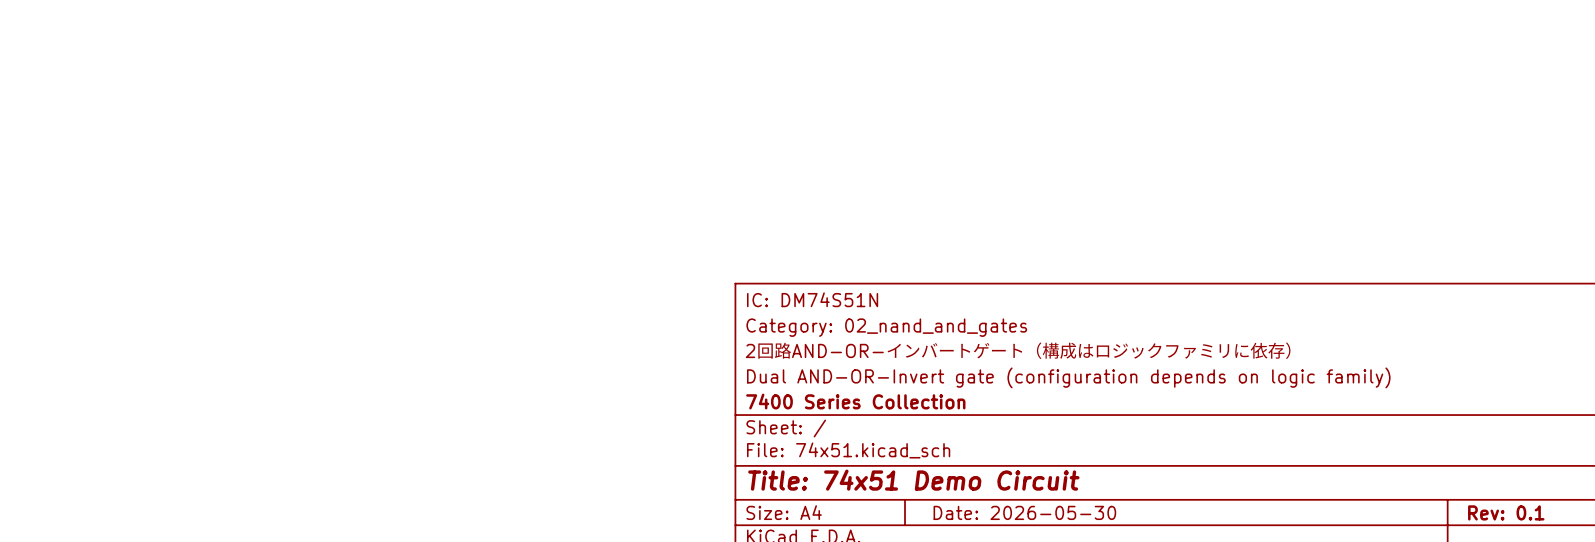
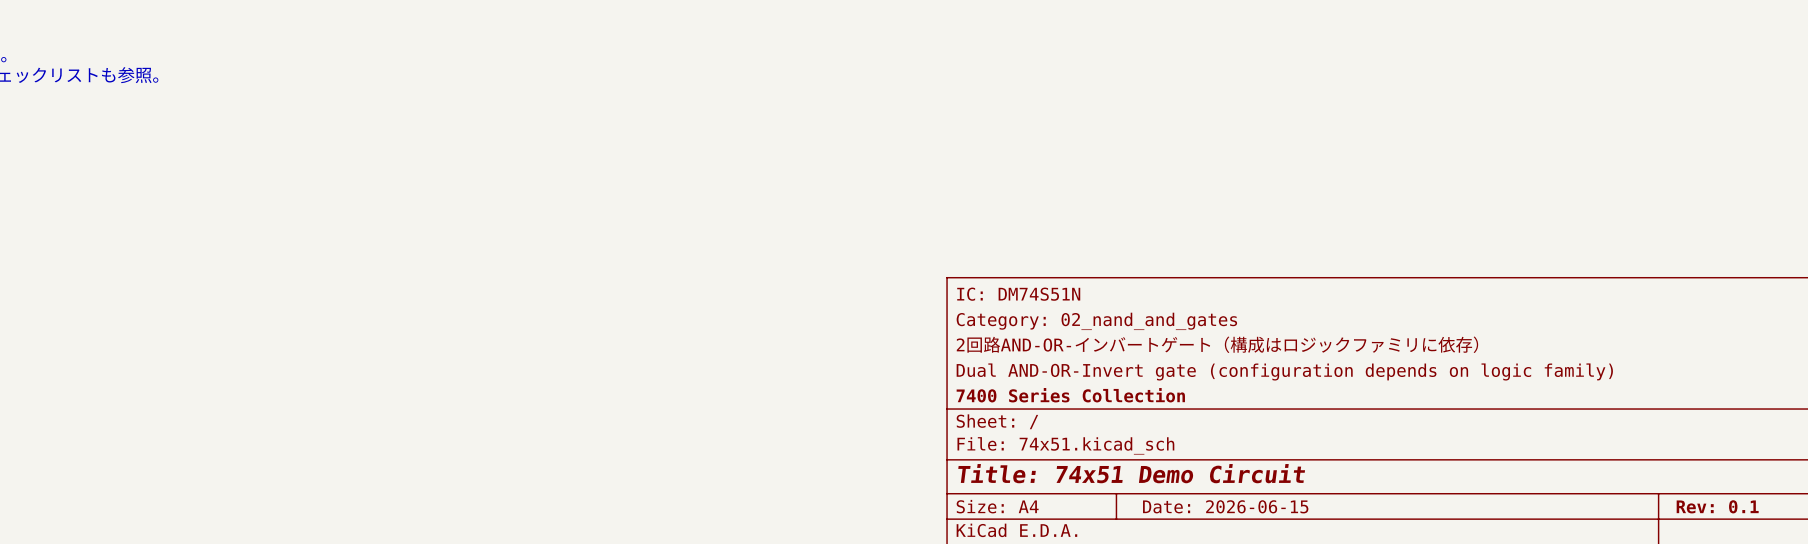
title block: Date: 2026-05-30 (1024, 512) -> Date: 2026-06-15 (1225, 506)

